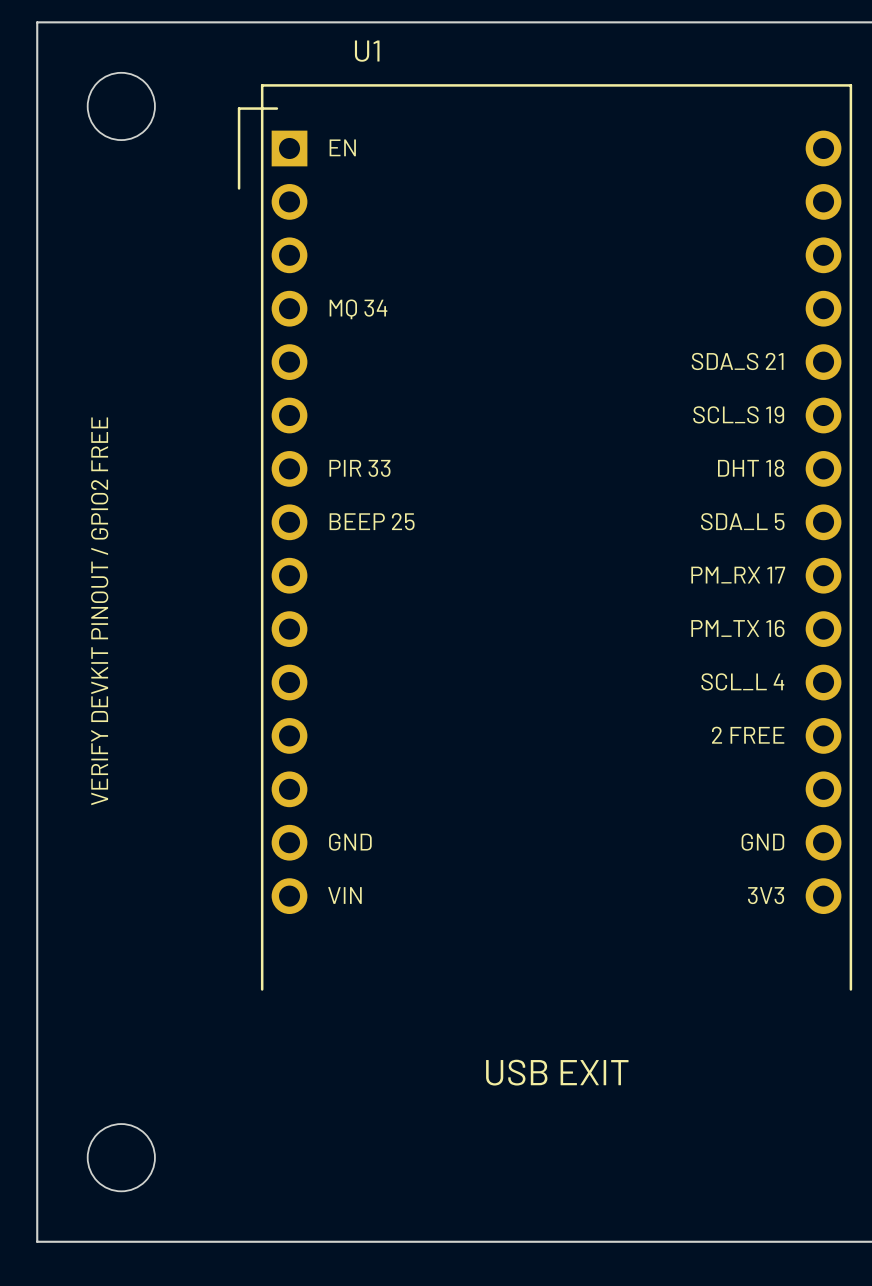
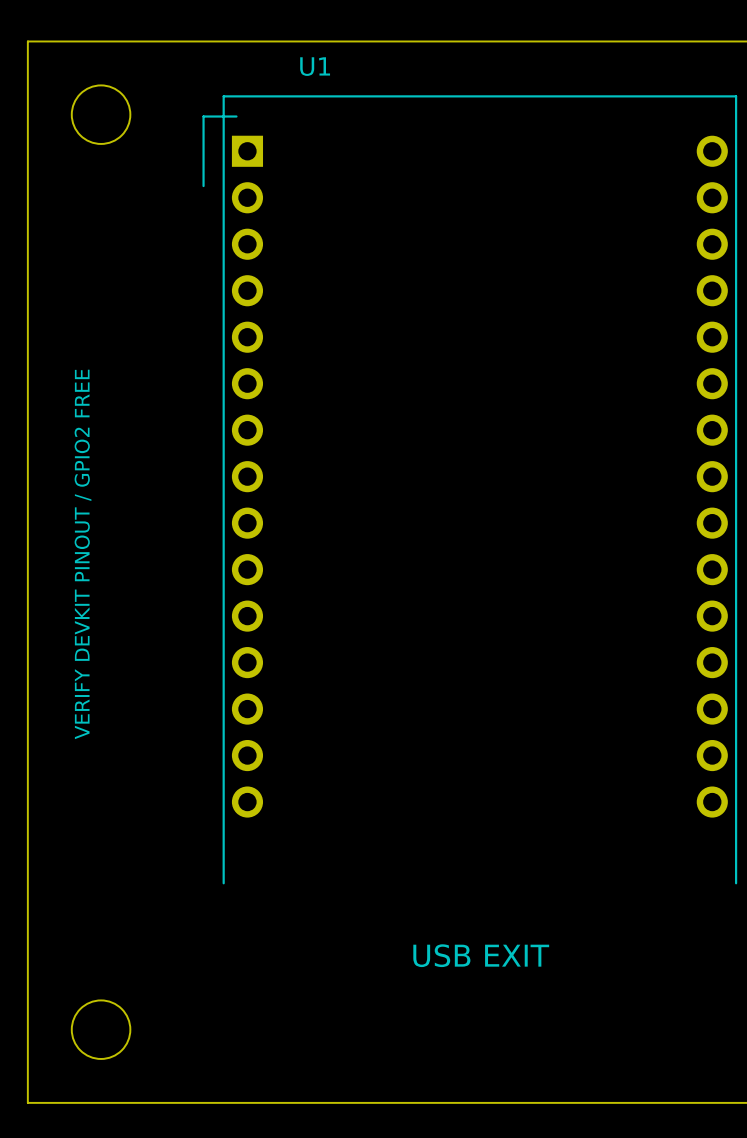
text: EN (342, 147) -> none
text: MQ 34 (358, 309) -> none
text: SDA_S 21 (737, 361) -> none
text: SCL_S 19 (738, 414) -> none
text: PIR 33 (359, 468) -> none
text: DHT 18 (751, 468) -> none
text: BEEP 25 (372, 521) -> none
text: SDA_L 5 (742, 521) -> none
text: PM_RX 17 (738, 575) -> none
text: PM_TX 16 (737, 628) -> none
text: SCL_L 4 (742, 681) -> none
text: 2 FREE (748, 735) -> none
text: GND (350, 842) -> none
text: GND (762, 842) -> none
text: VIN (344, 895) -> none
text: 3V3 (766, 895) -> none

